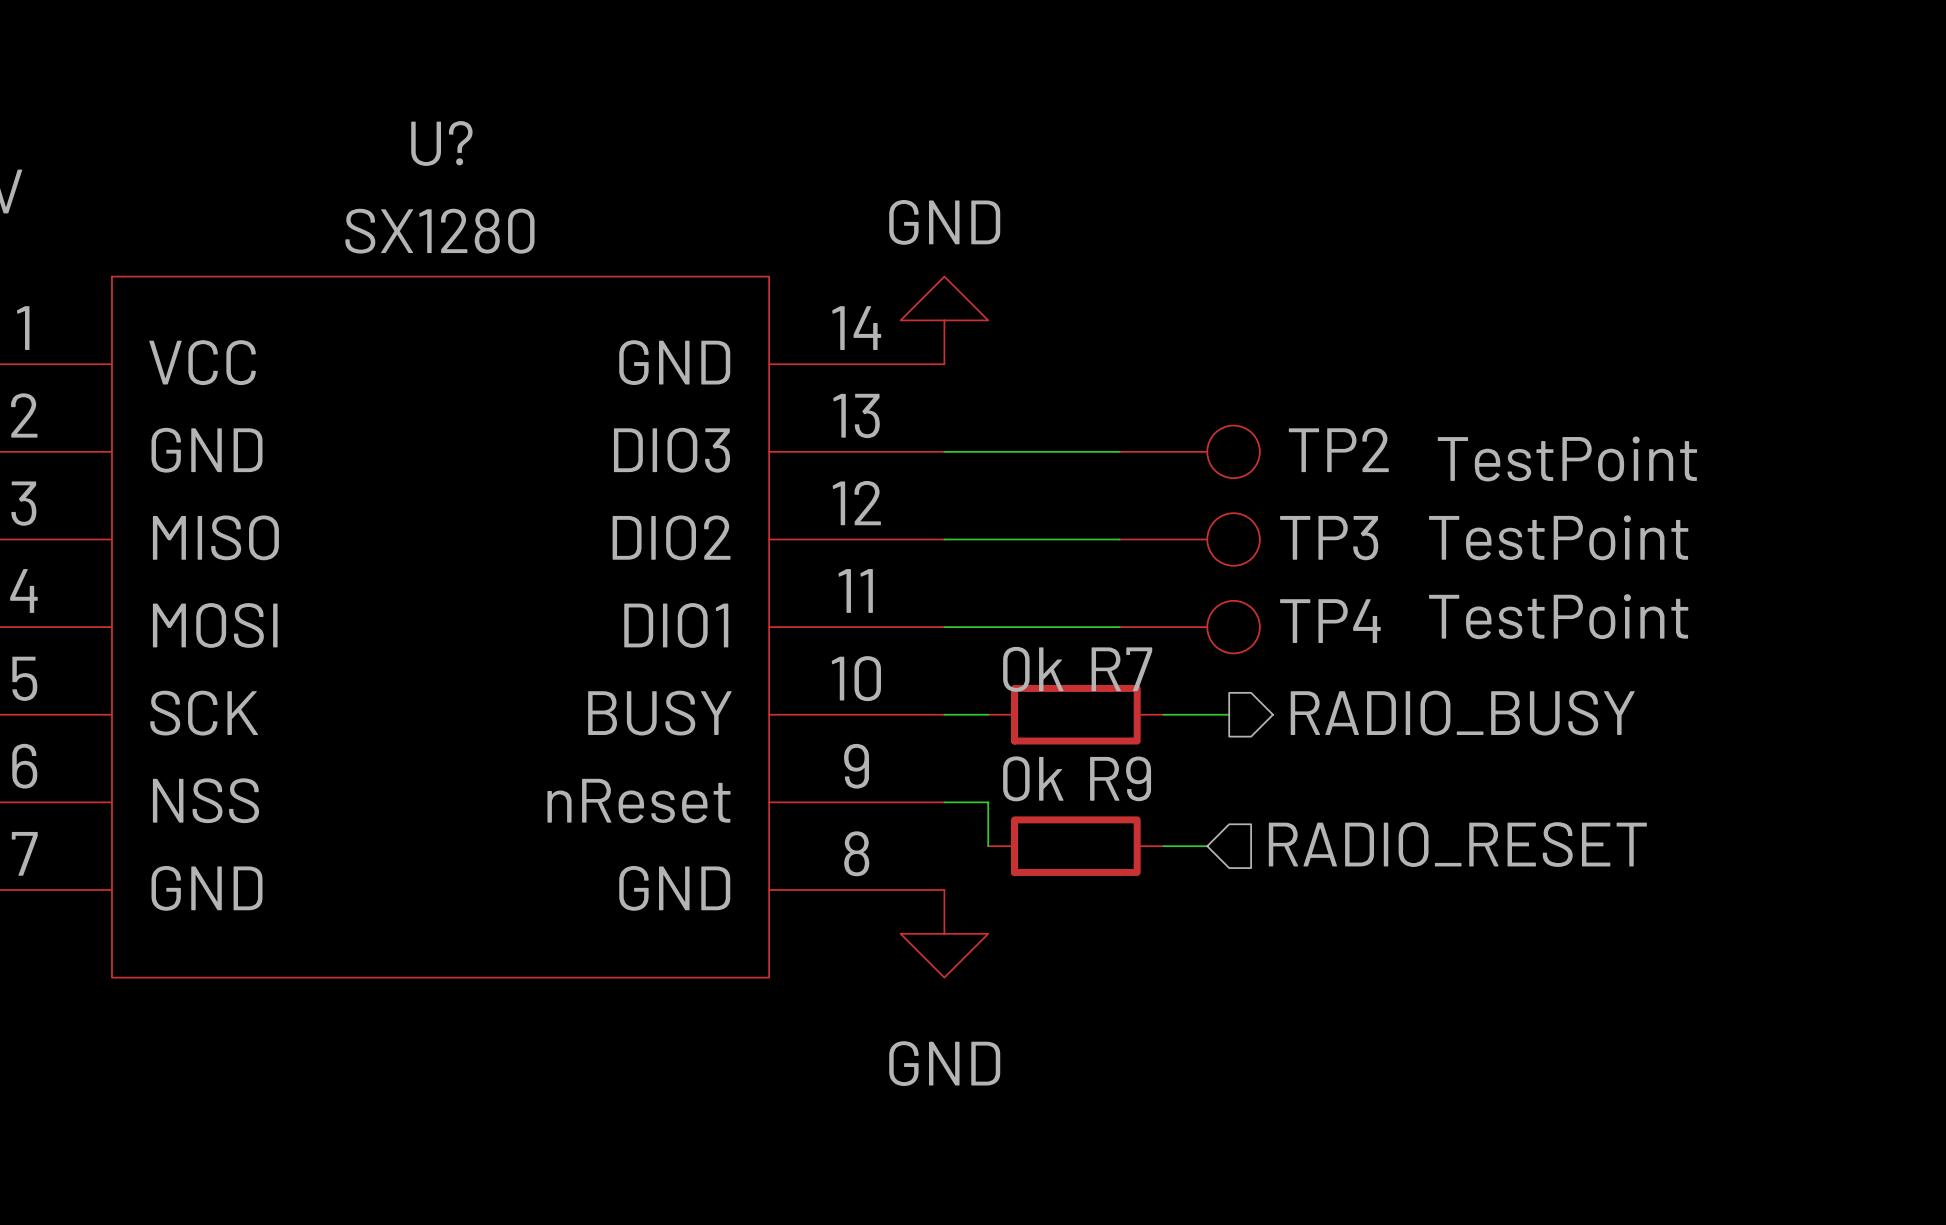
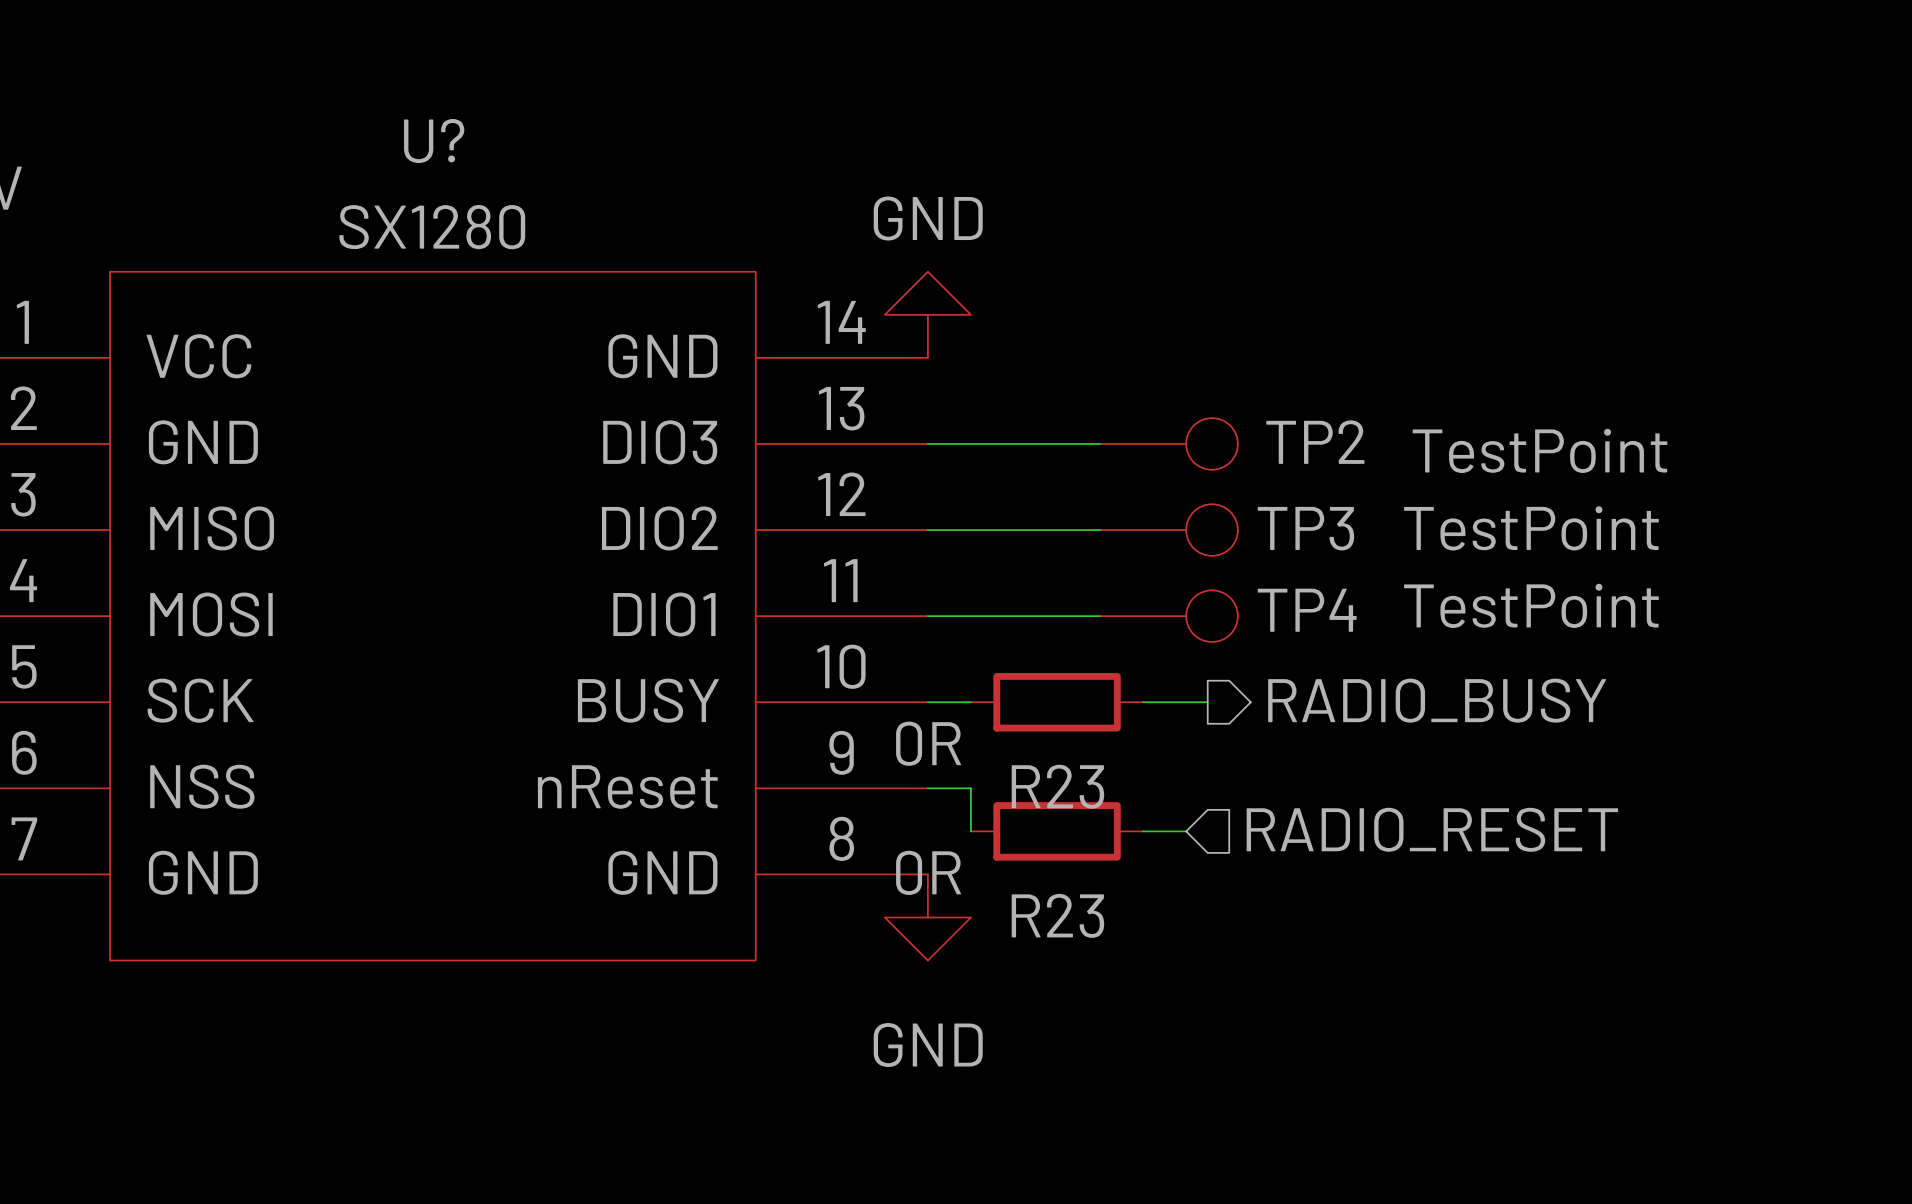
R7 value: 0k (1033, 669) -> 0R (928, 743)
R7 name: R7 (1121, 669) -> R23 (1057, 786)
R9 value: 0k (1033, 778) -> 0R (928, 872)
R9 name: R9 (1120, 778) -> R23 (1057, 915)

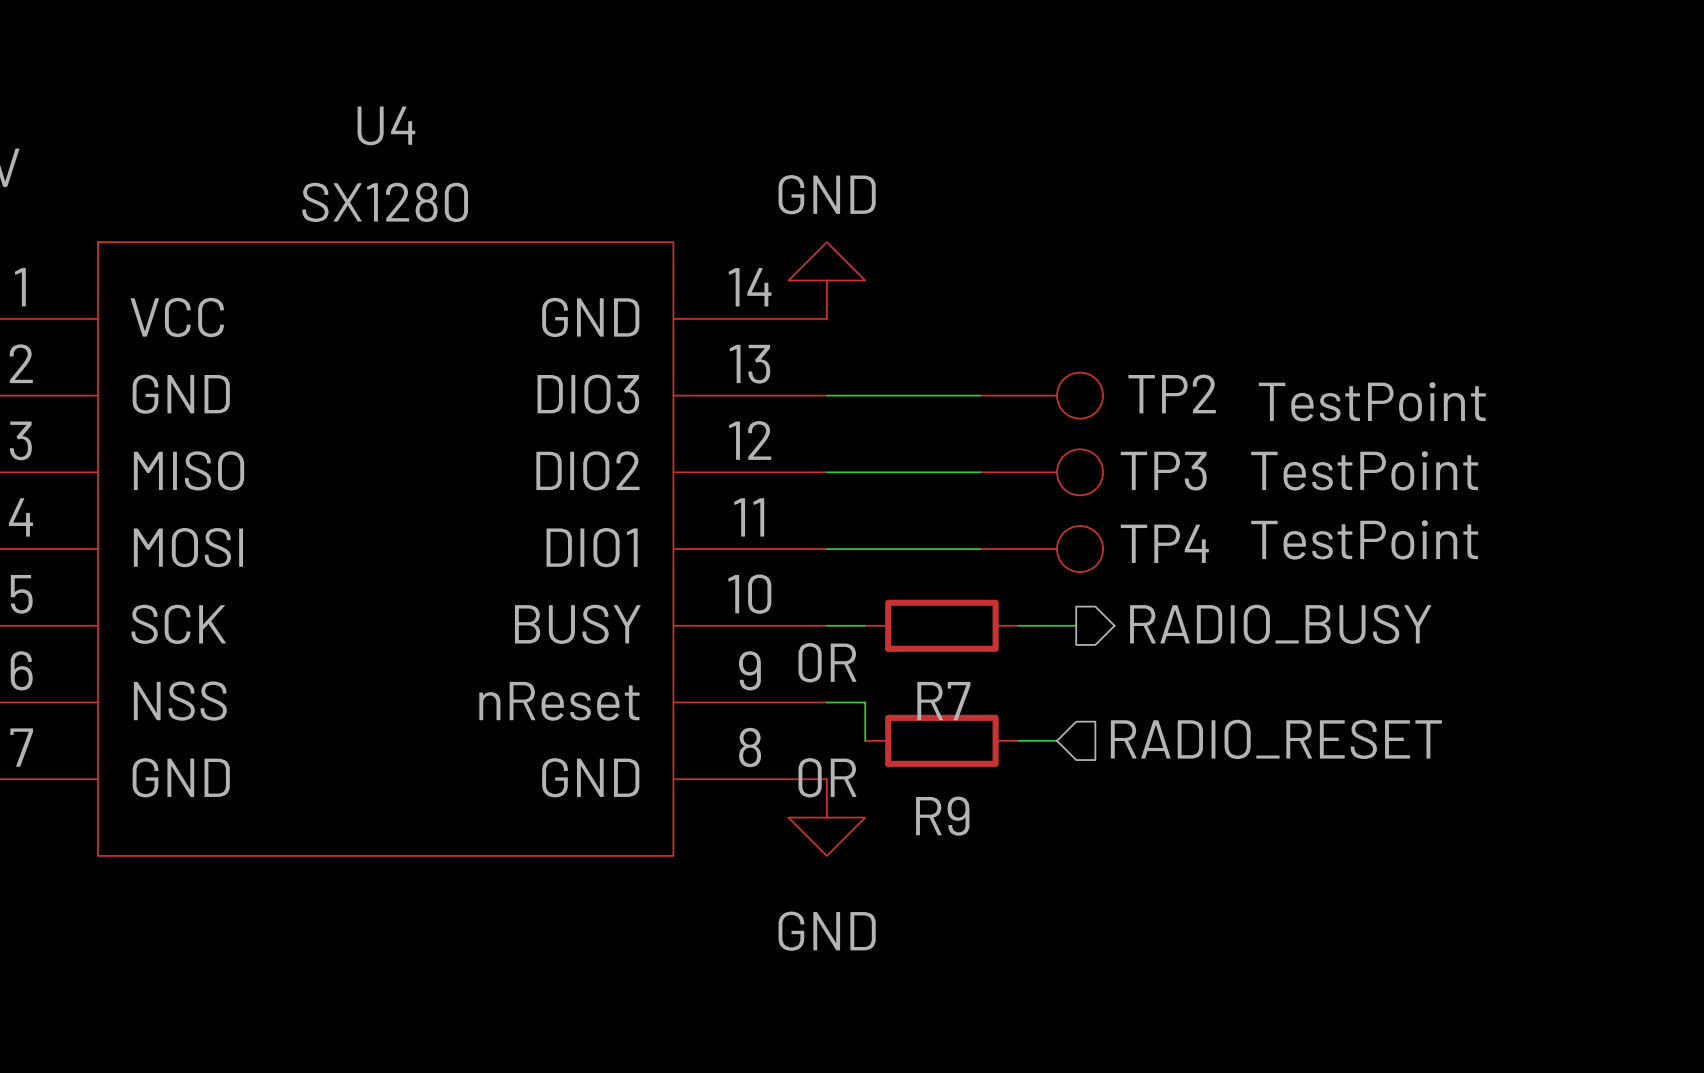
U? name: U? (434, 140) -> U4 (386, 125)
R23 name: R23 (1057, 786) -> R7 (943, 701)
R23 name: R23 (1057, 915) -> R9 (942, 816)

